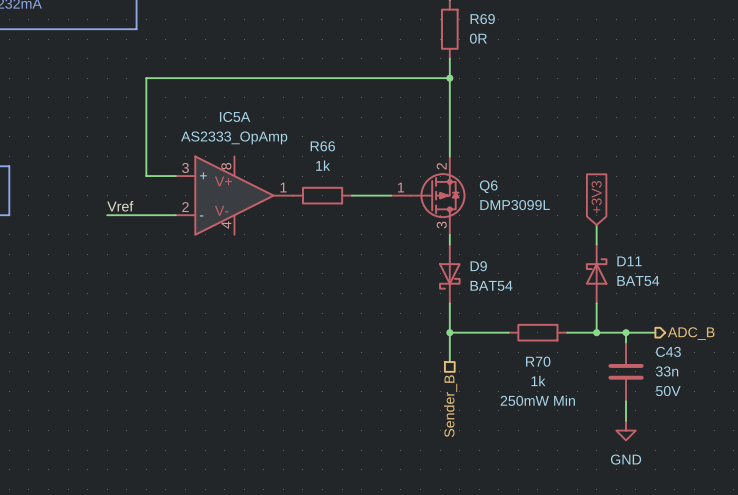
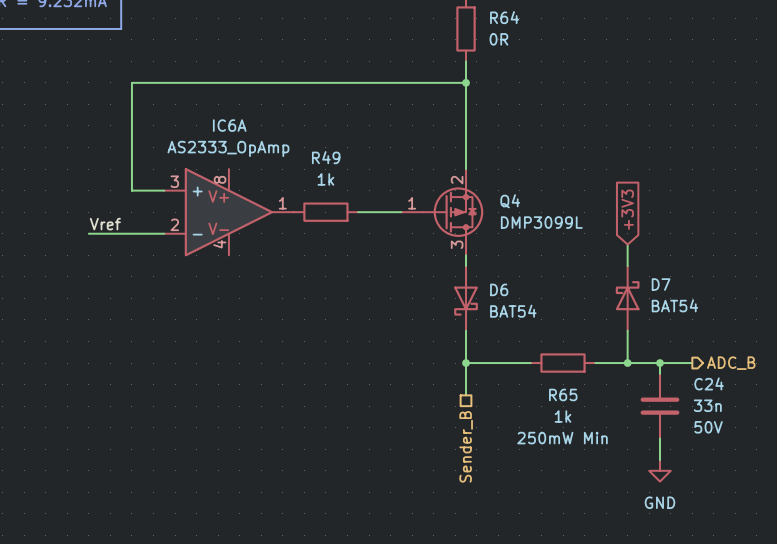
R69 name: R69 (482, 19) -> R64 (504, 17)
IC5A name: IC5A (235, 116) -> IC6A (229, 125)
R66 name: R66 (322, 146) -> R49 (326, 157)
Q6 name: Q6 (488, 186) -> Q4 (510, 201)
D11 name: D11 (629, 261) -> D7 (661, 284)
D9 name: D9 (478, 266) -> D6 (499, 289)
C43 name: C43 (668, 351) -> C24 (709, 383)
R70 name: R70 (538, 361) -> R65 (563, 394)

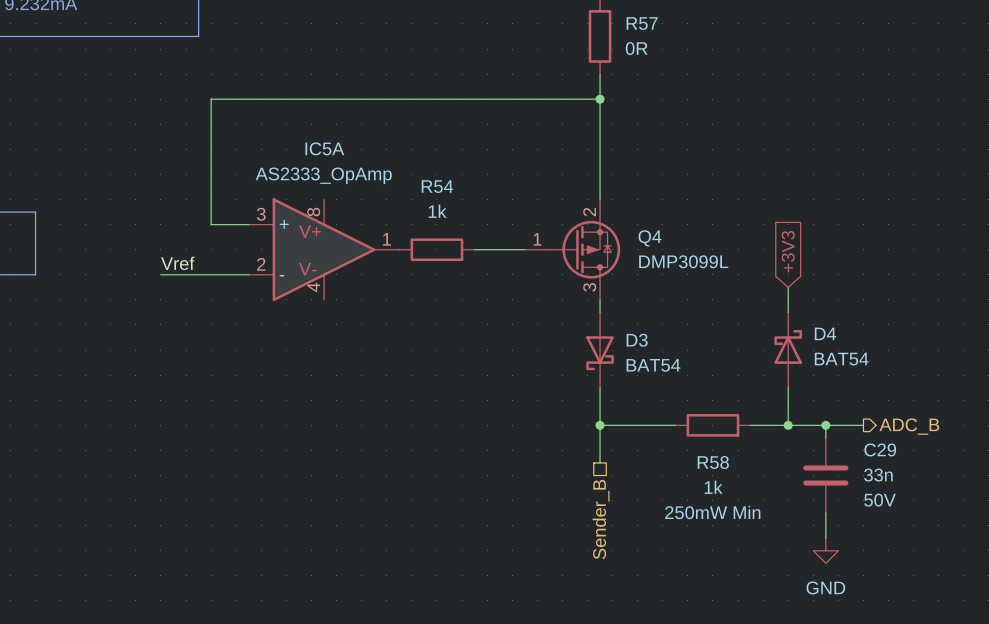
R64 name: R64 (504, 17) -> R57 (642, 23)
IC6A name: IC6A (229, 125) -> IC5A (324, 148)
R49 name: R49 (326, 157) -> R54 (437, 186)
D7 name: D7 (661, 284) -> D4 (825, 333)
D6 name: D6 (499, 289) -> D3 (637, 340)
C24 name: C24 (709, 383) -> C29 (880, 449)
R65 name: R65 (563, 394) -> R58 (713, 462)

